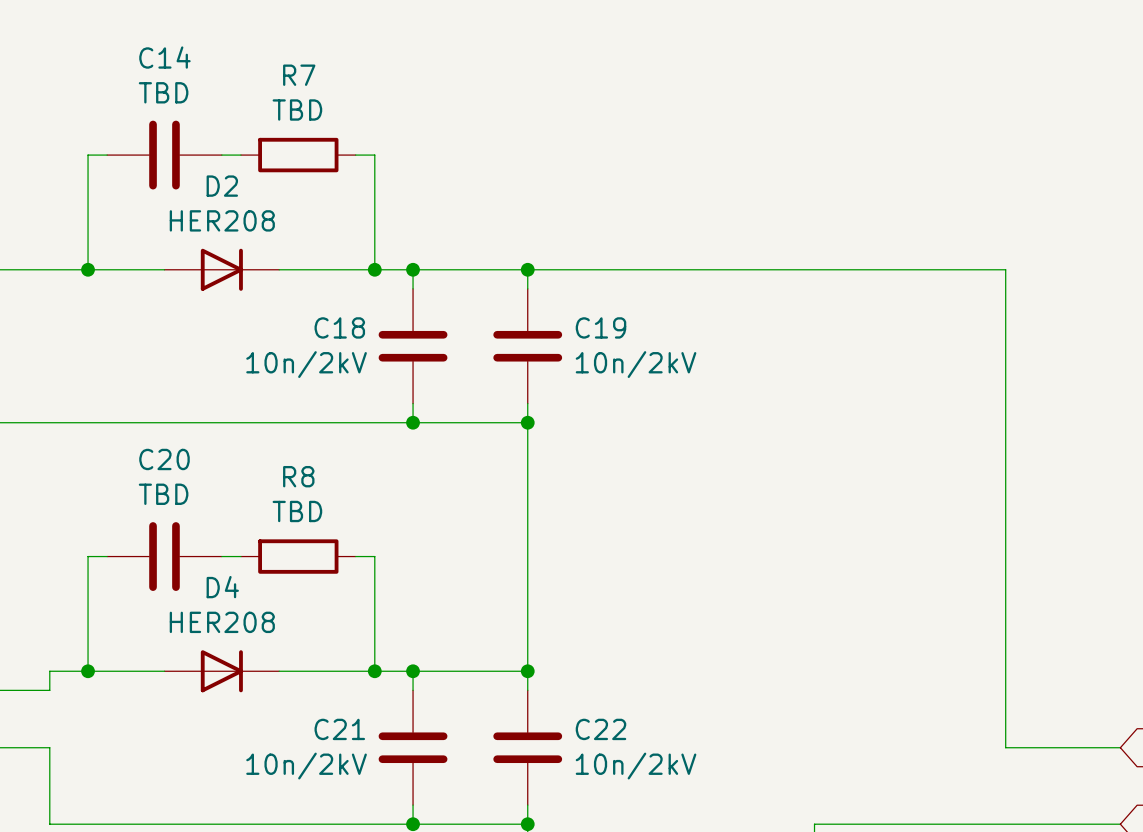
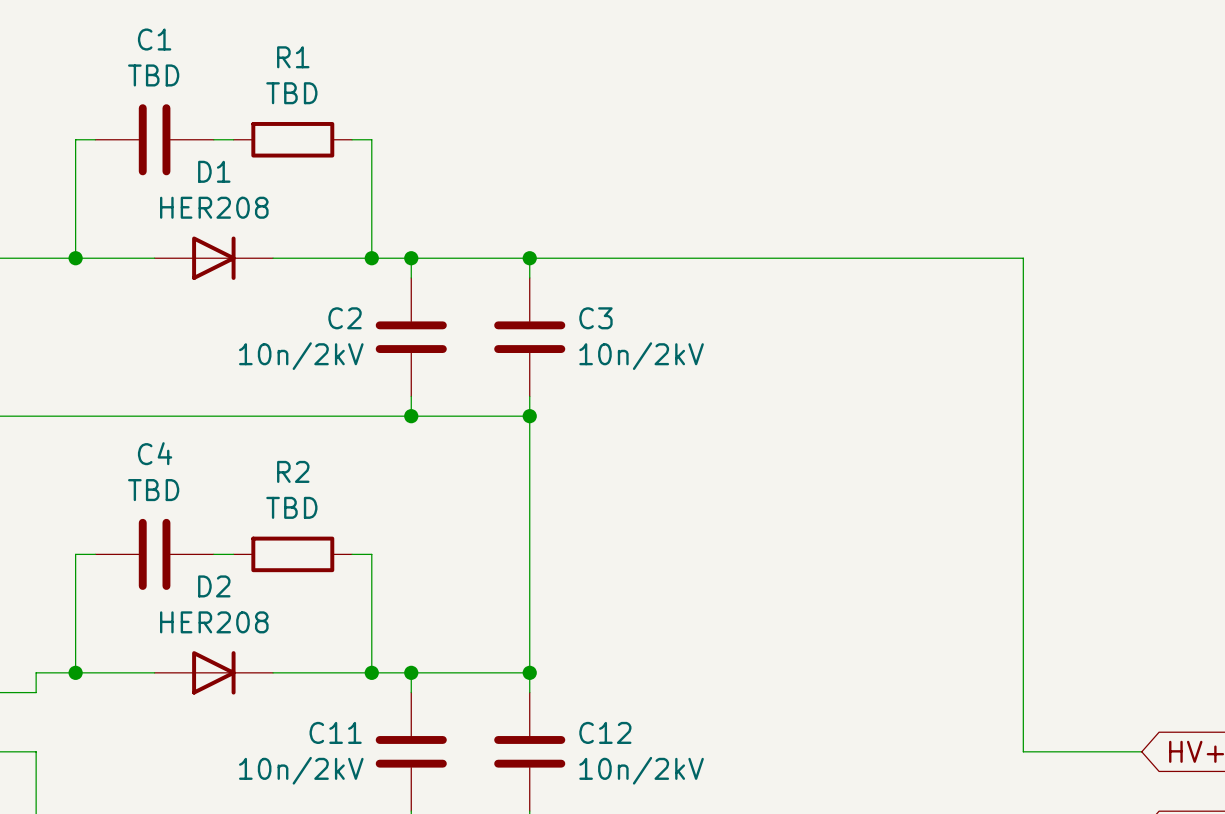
C14 name: C14 (164, 57) -> C1 (154, 39)
R7 name: R7 (299, 75) -> R1 (293, 57)
D2 name: D2 (222, 186) -> D1 (214, 171)
C18 name: C18 (339, 327) -> C2 (345, 318)
C19 name: C19 (600, 327) -> C3 (595, 318)
C20 name: C20 (164, 459) -> C4 (155, 453)
R8 name: R8 (298, 476) -> R2 (293, 471)
D4 name: D4 (222, 587) -> D2 (214, 586)
C21 name: C21 (339, 729) -> C11 (335, 732)
C22 name: C22 (600, 729) -> C12 (605, 732)

